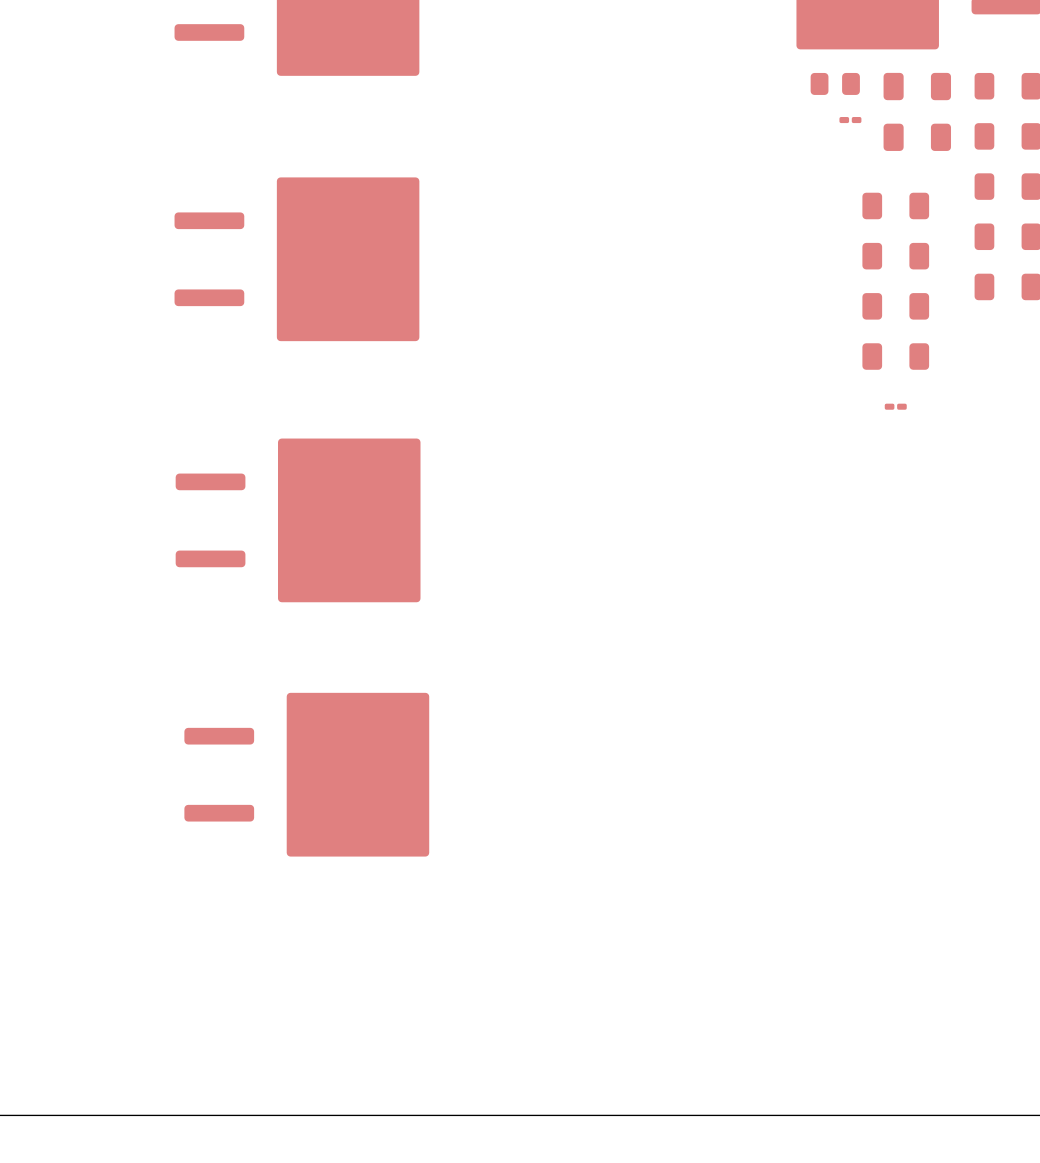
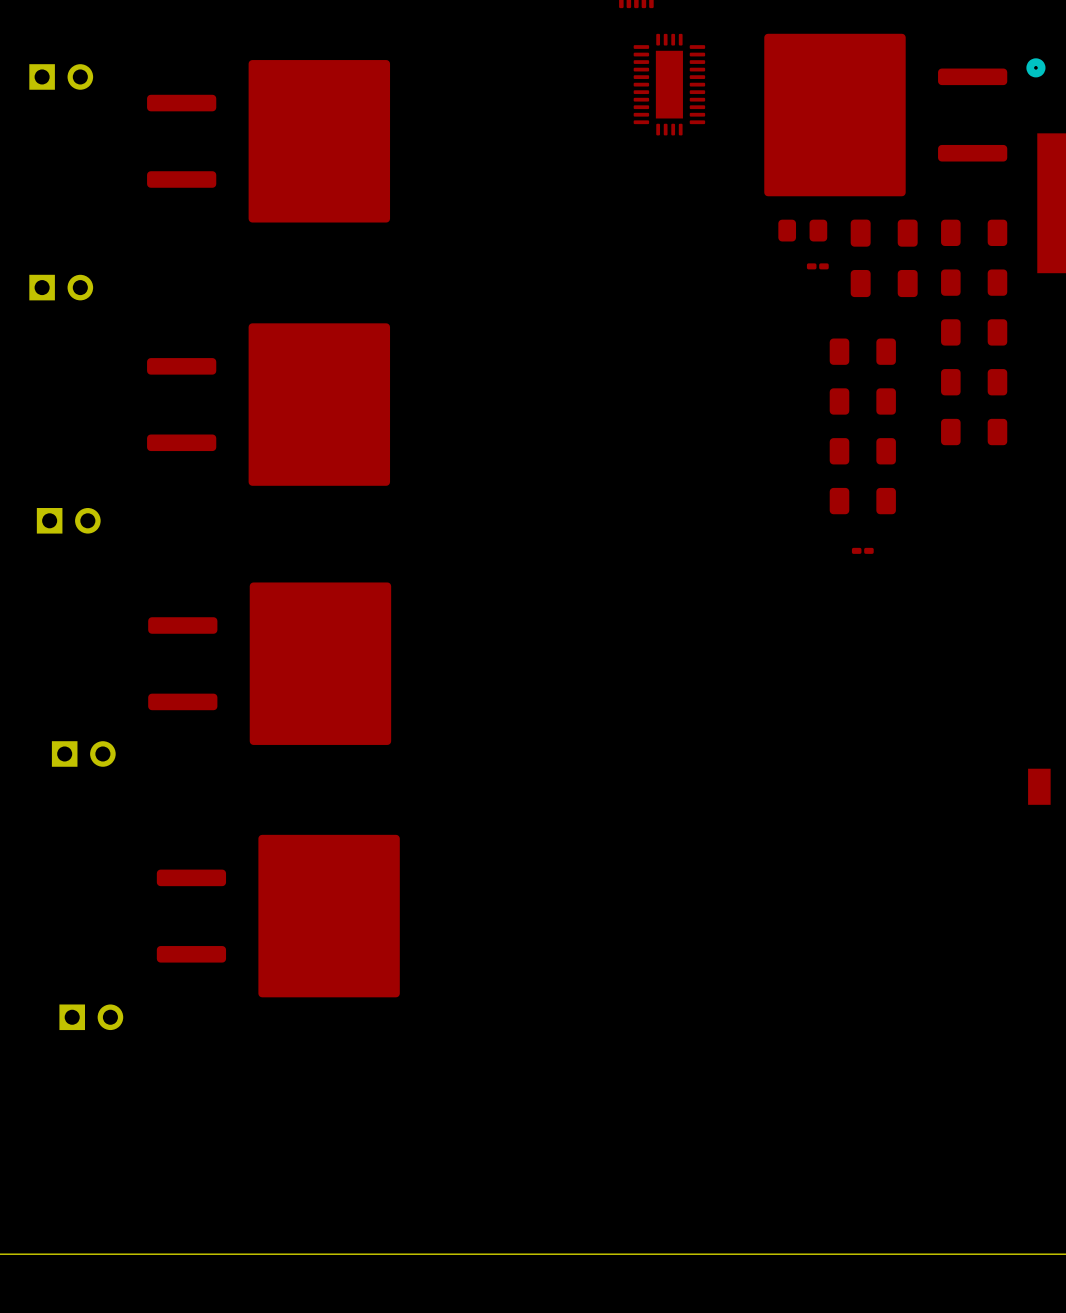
part: none -> (61, 287)
part: none -> (68, 520)
part: none -> (83, 753)
part: none -> (91, 1017)

